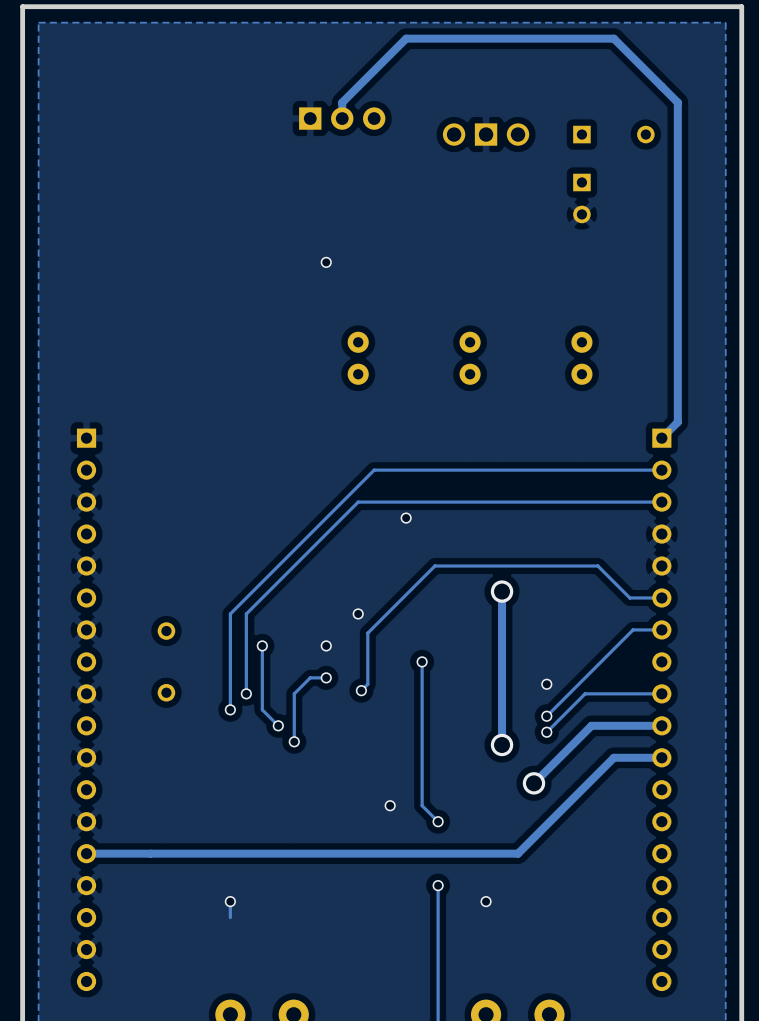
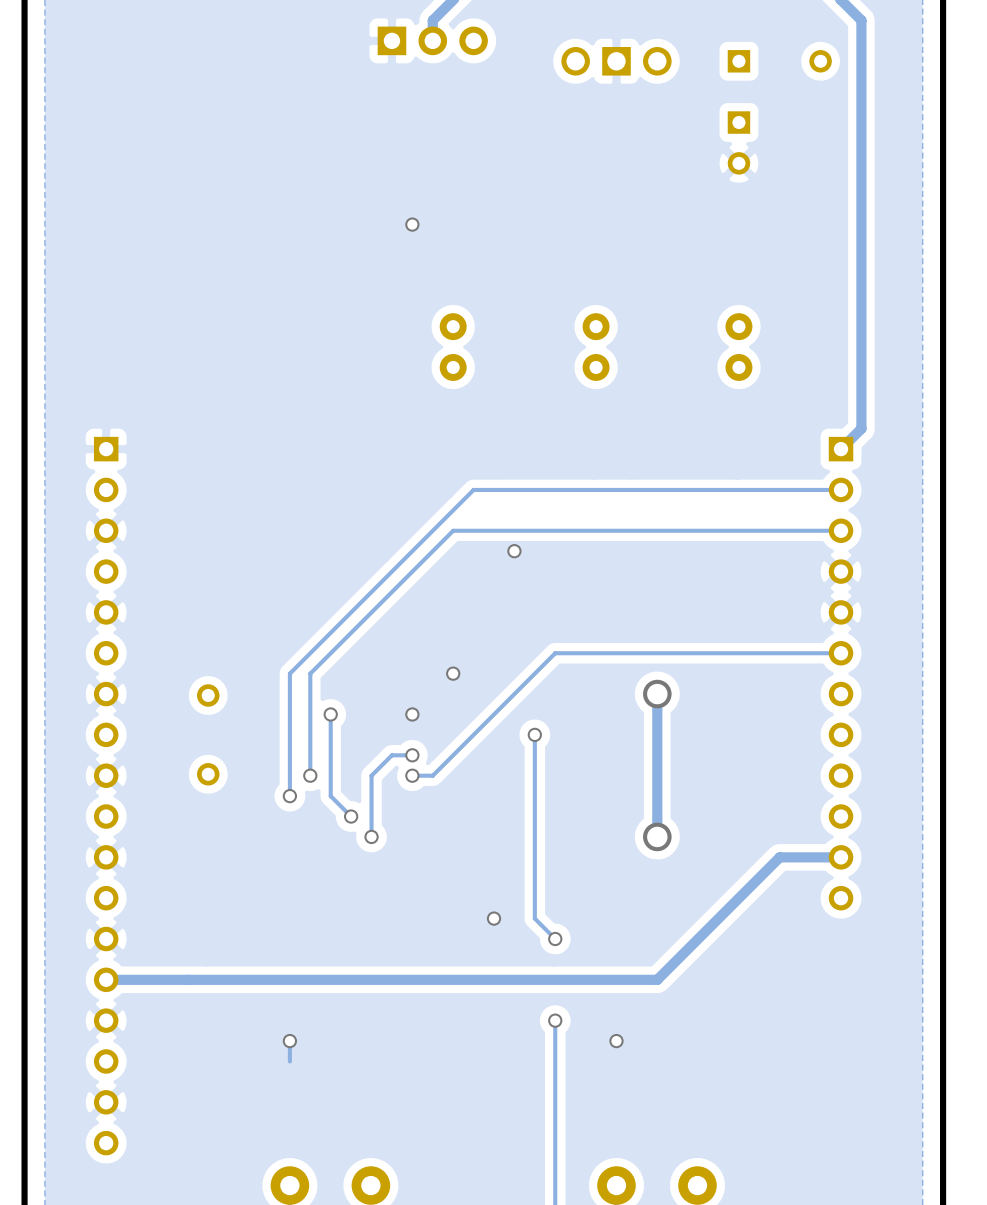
track: (502, 591) (502, 748) -> none
via position: (502, 591) -> (657, 694)
track: (629, 597) (597, 566) (434, 566) (367, 633) (367, 684) (361, 690) -> (800, 653) (555, 653) (432, 775) (412, 775)
part: none -> (841, 673)
track: none -> (657, 694) (657, 836)
track: (661, 629) (633, 629) (546, 716) -> none
via: (546, 684) -> none
via position: (361, 690) -> (412, 775)
track: (661, 693) (585, 693) (546, 732) -> none
part: (661, 709) -> none
via: (546, 716) -> none
track: (661, 725) (591, 725) (533, 783) -> none
via: (546, 732) -> none
via position: (502, 744) -> (657, 836)
via: (533, 783) -> none

